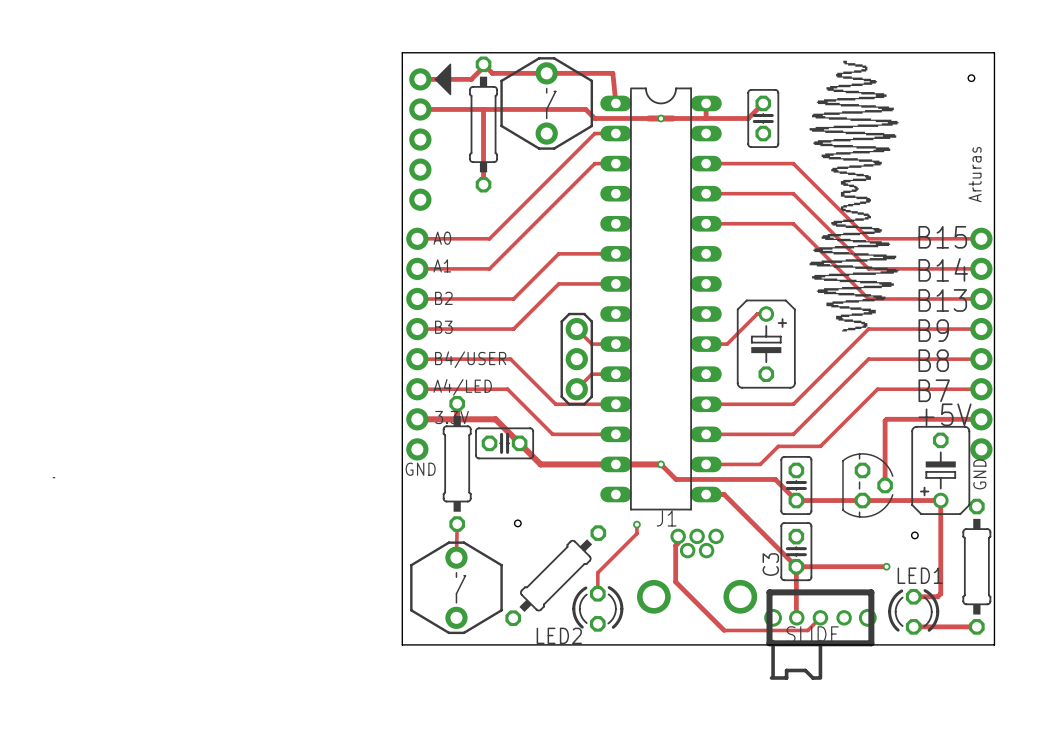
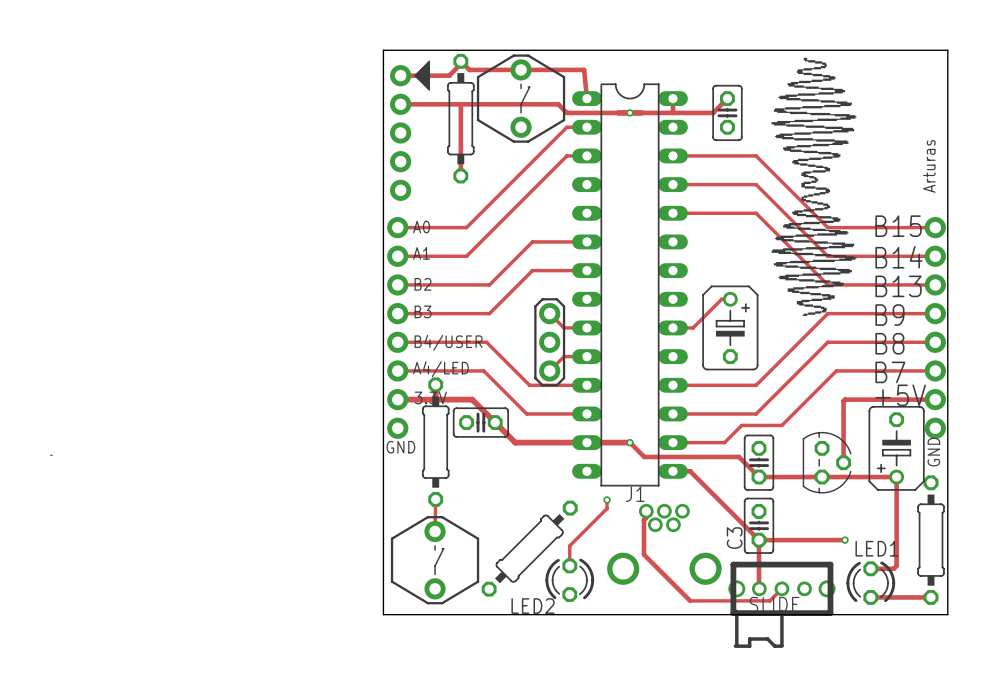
hole: (971, 78) -> none
hole: (517, 523) -> none
hole: (914, 535) -> none

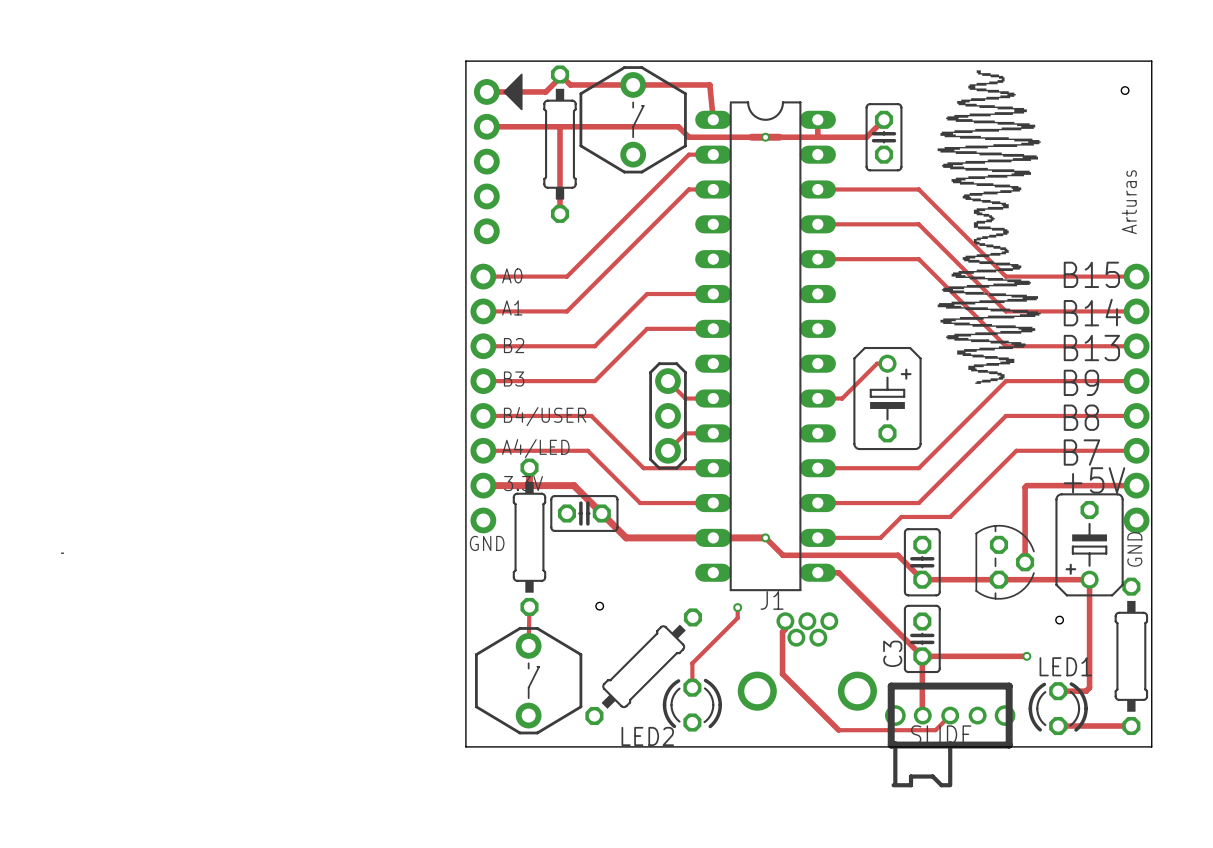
hole: none -> (1125, 90)
hole: none -> (599, 606)
hole: none -> (1059, 620)

